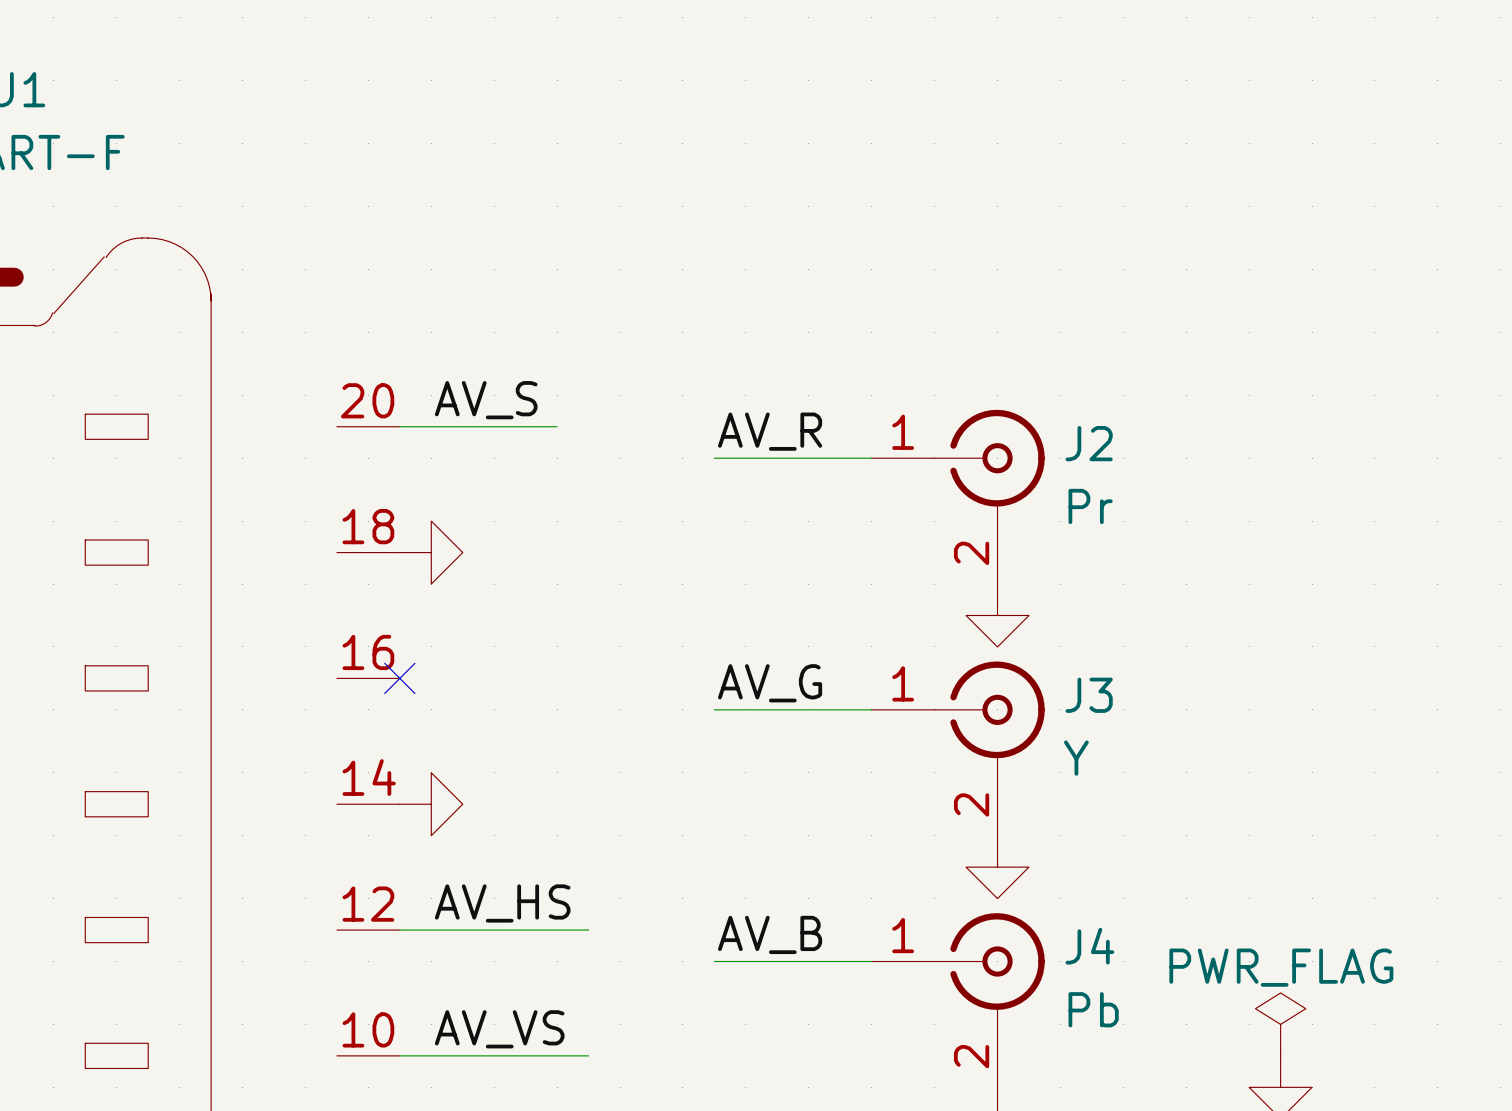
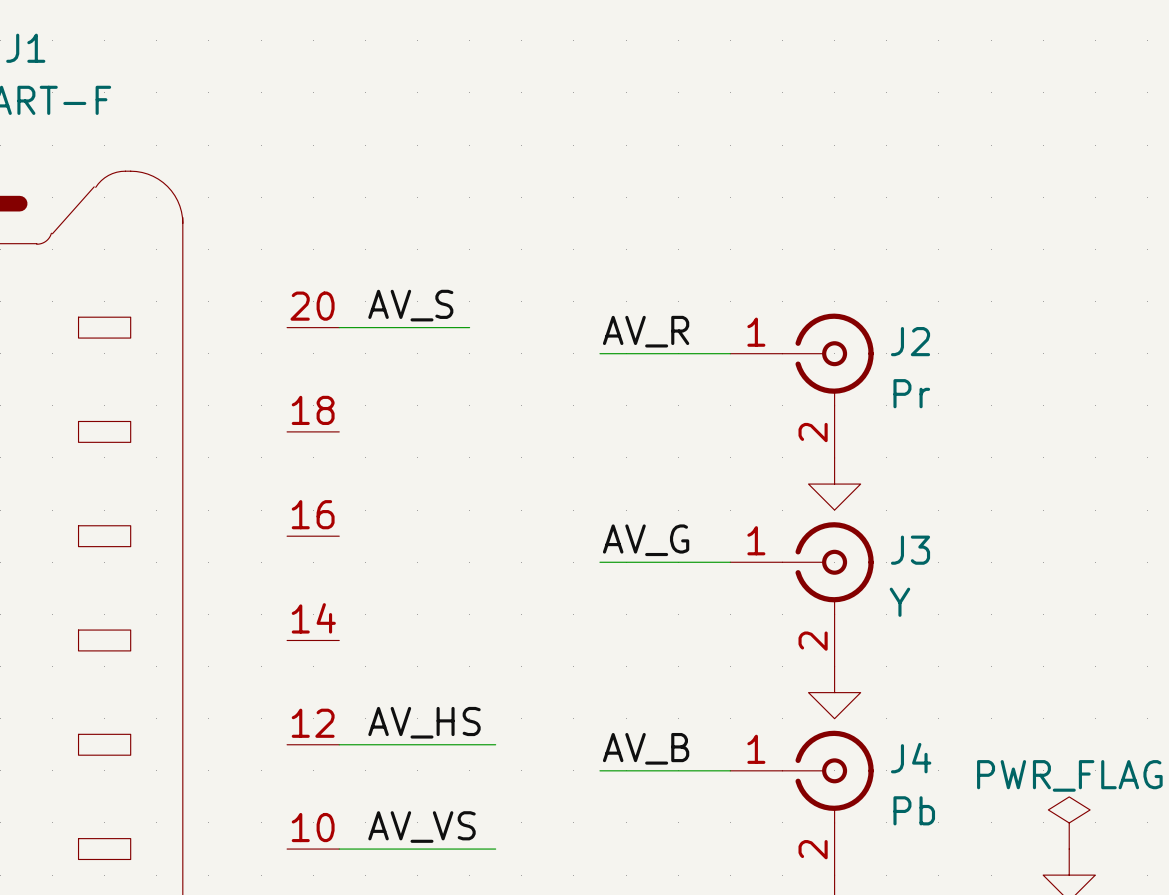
power symbol: (431, 552) -> none
no-connect mark: (399, 678) -> none
power symbol: (431, 804) -> none

